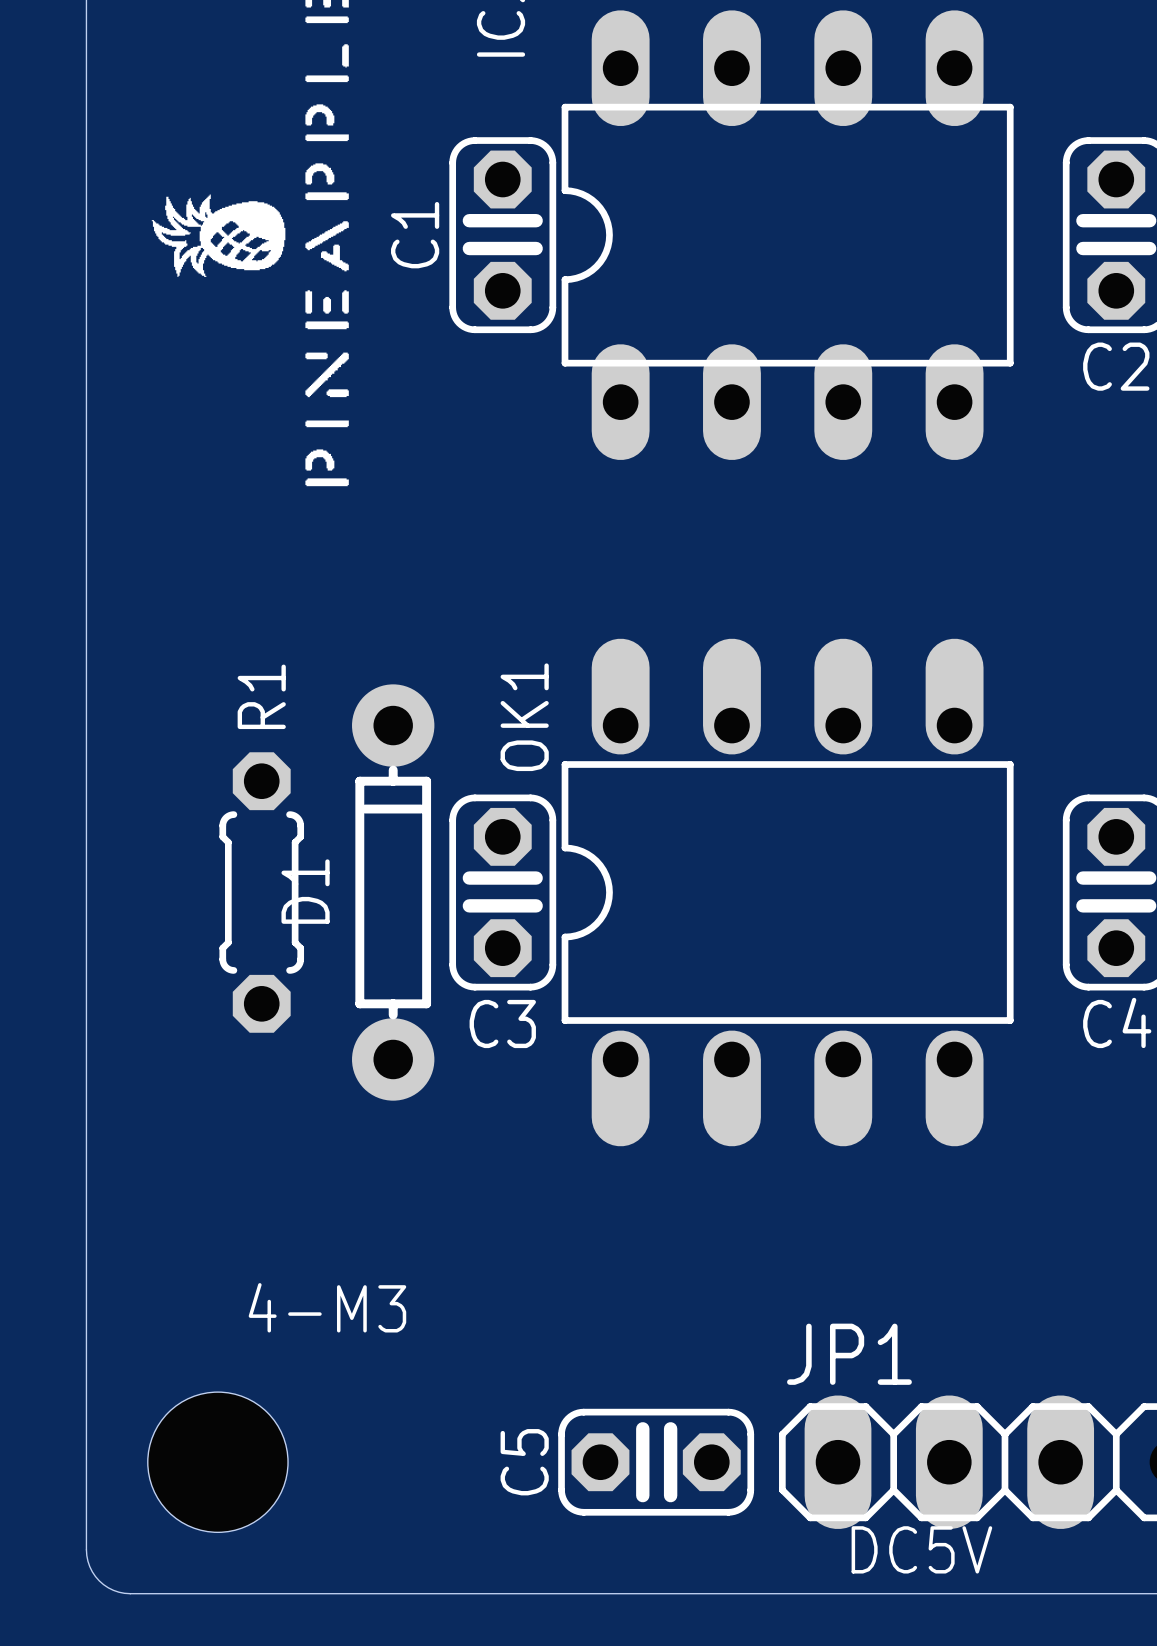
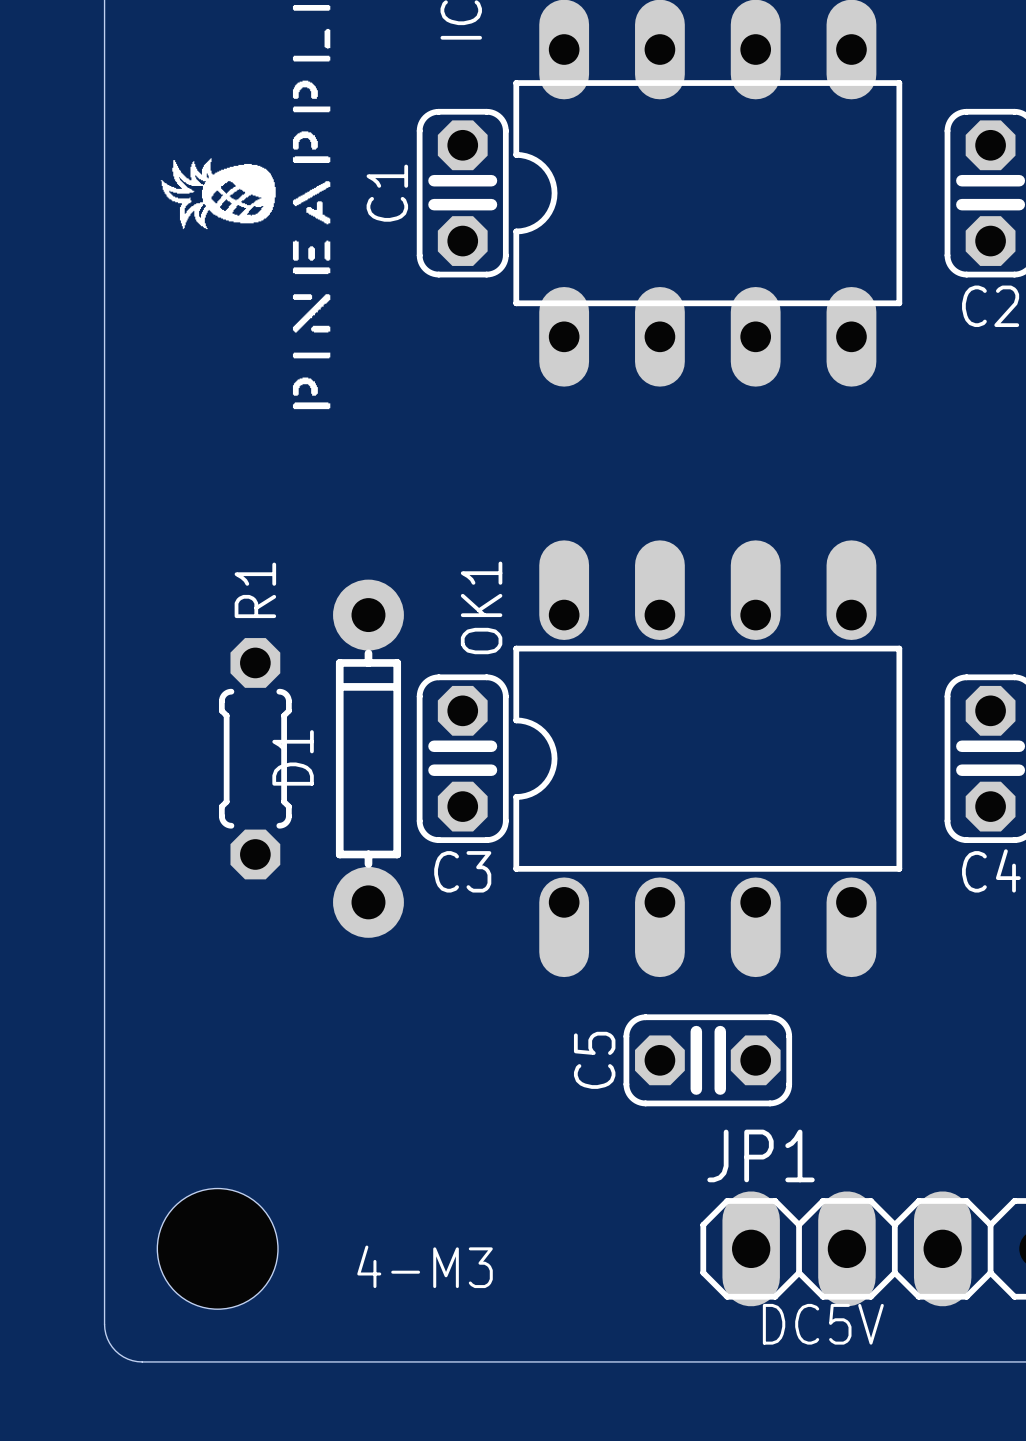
text position: 4-M3 (327, 1307) -> 4-M3 (425, 1266)
C5 position: (656, 1462) -> (707, 1060)

